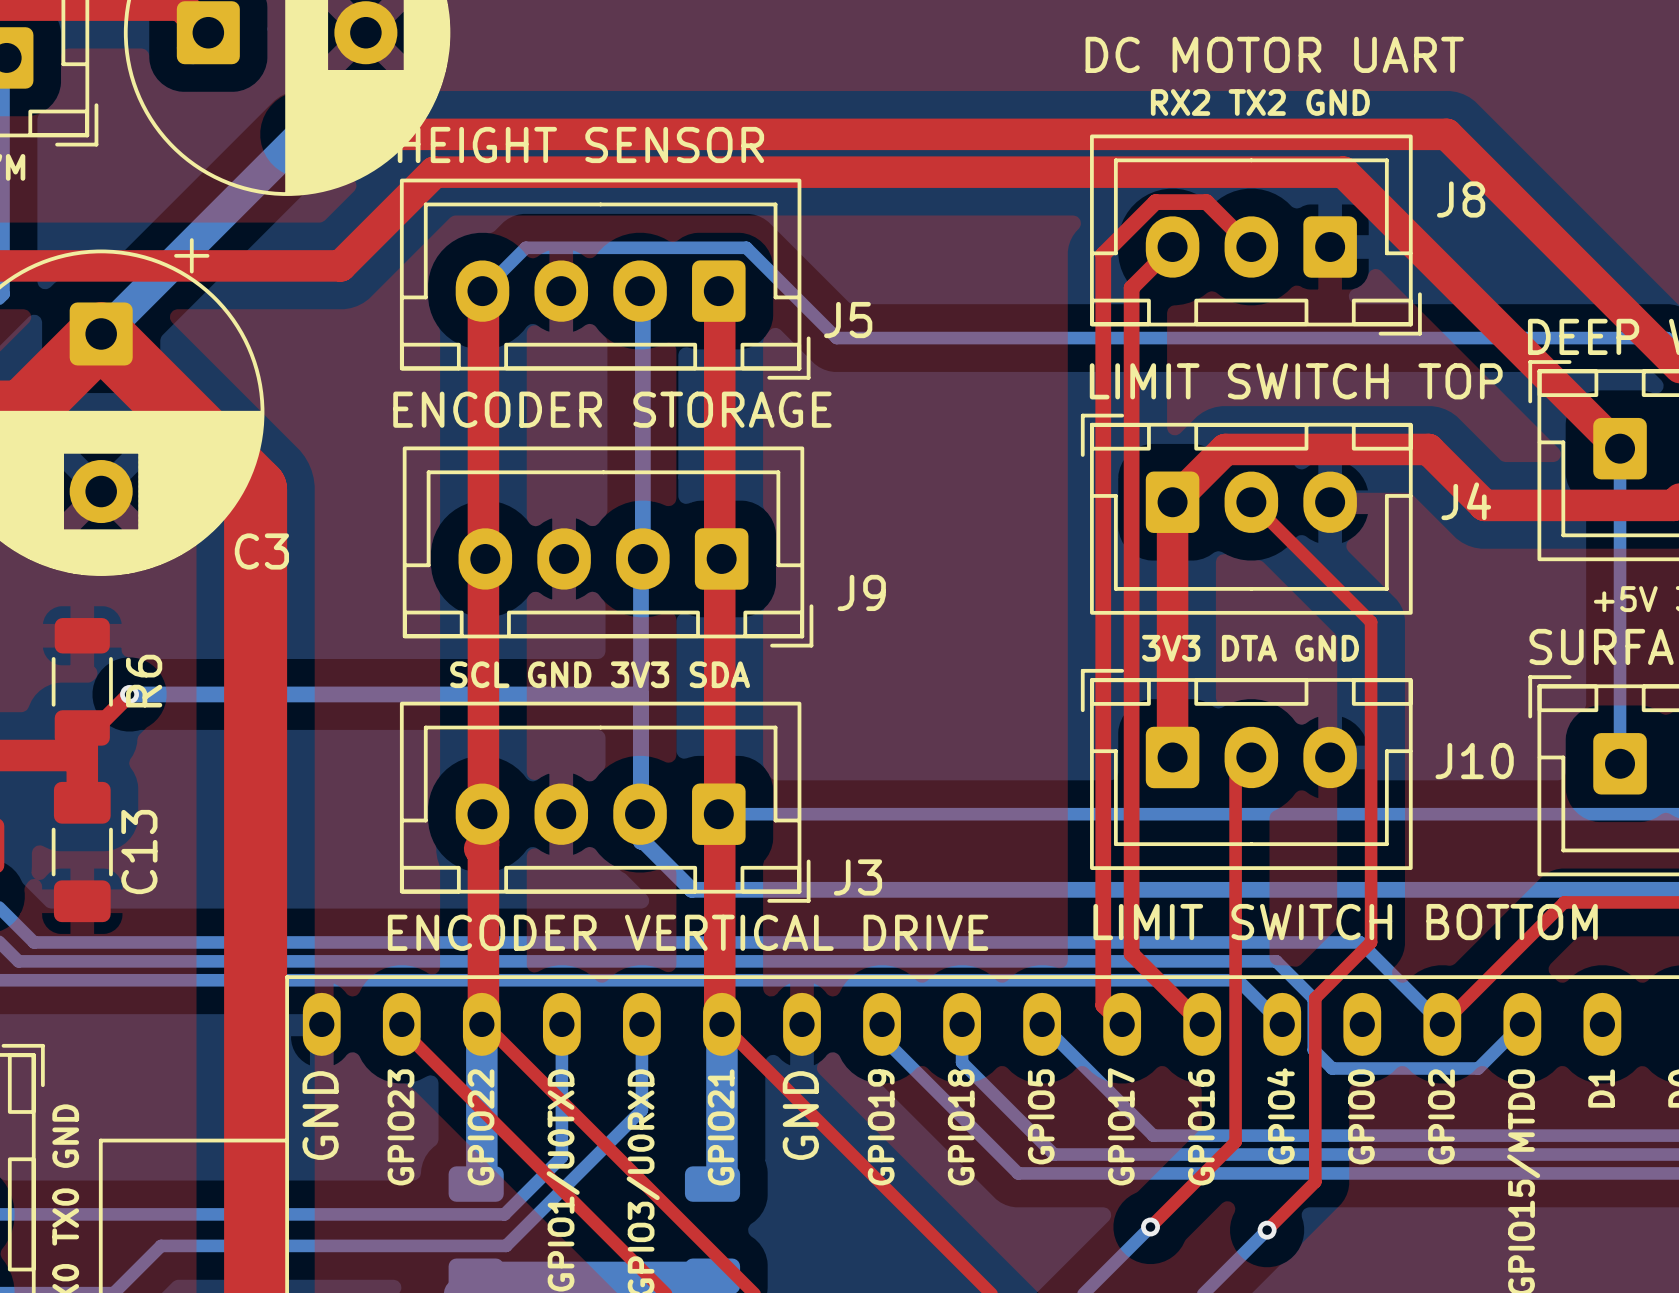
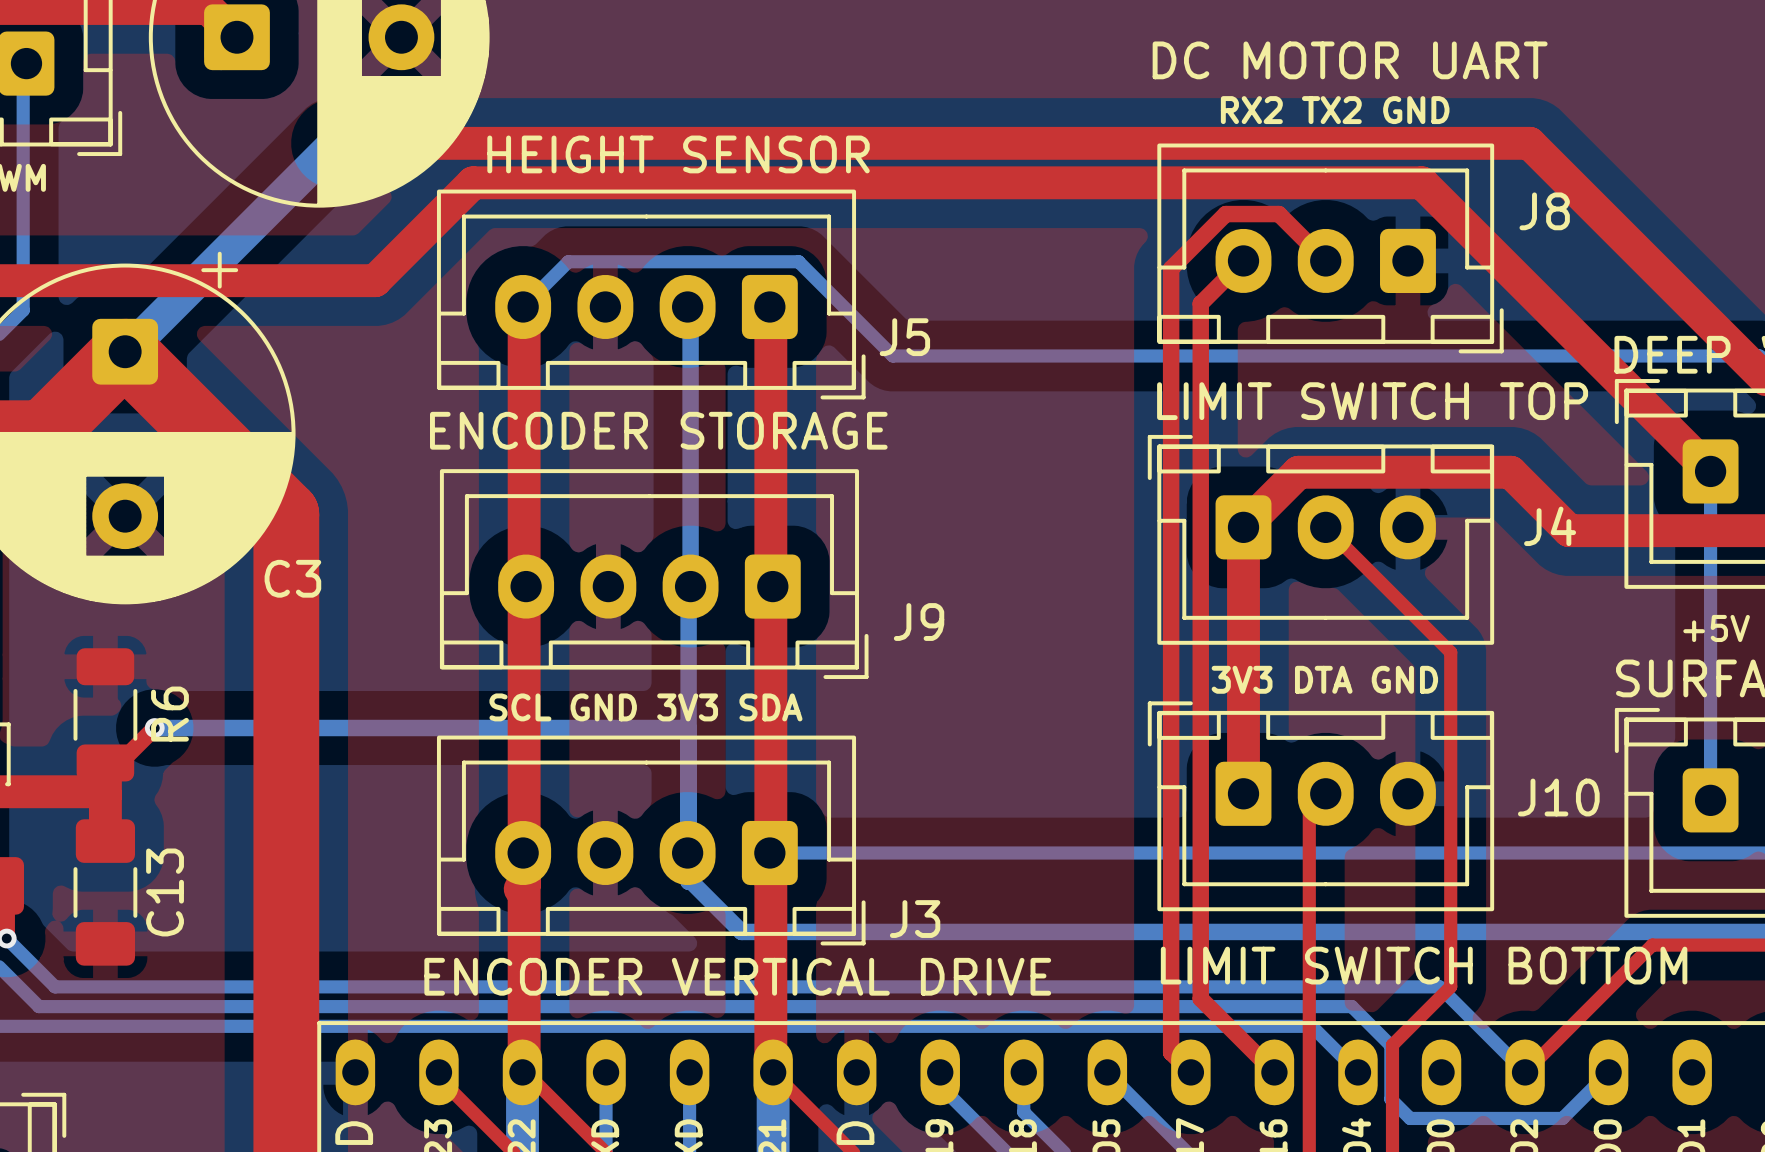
J5 value position: HEIGHT SENSOR (580, 144) -> HEIGHT SENSOR (678, 154)

